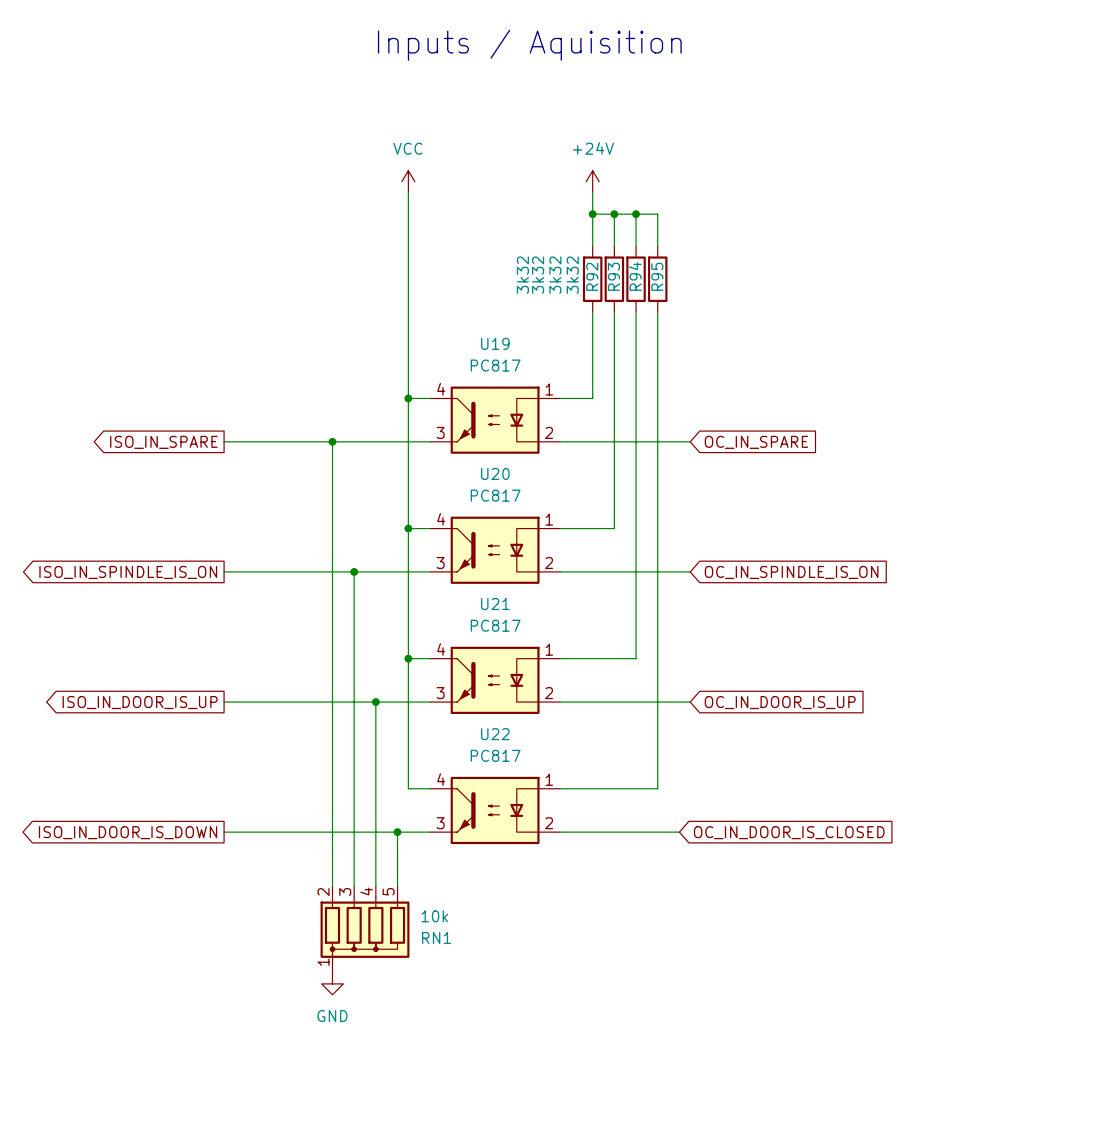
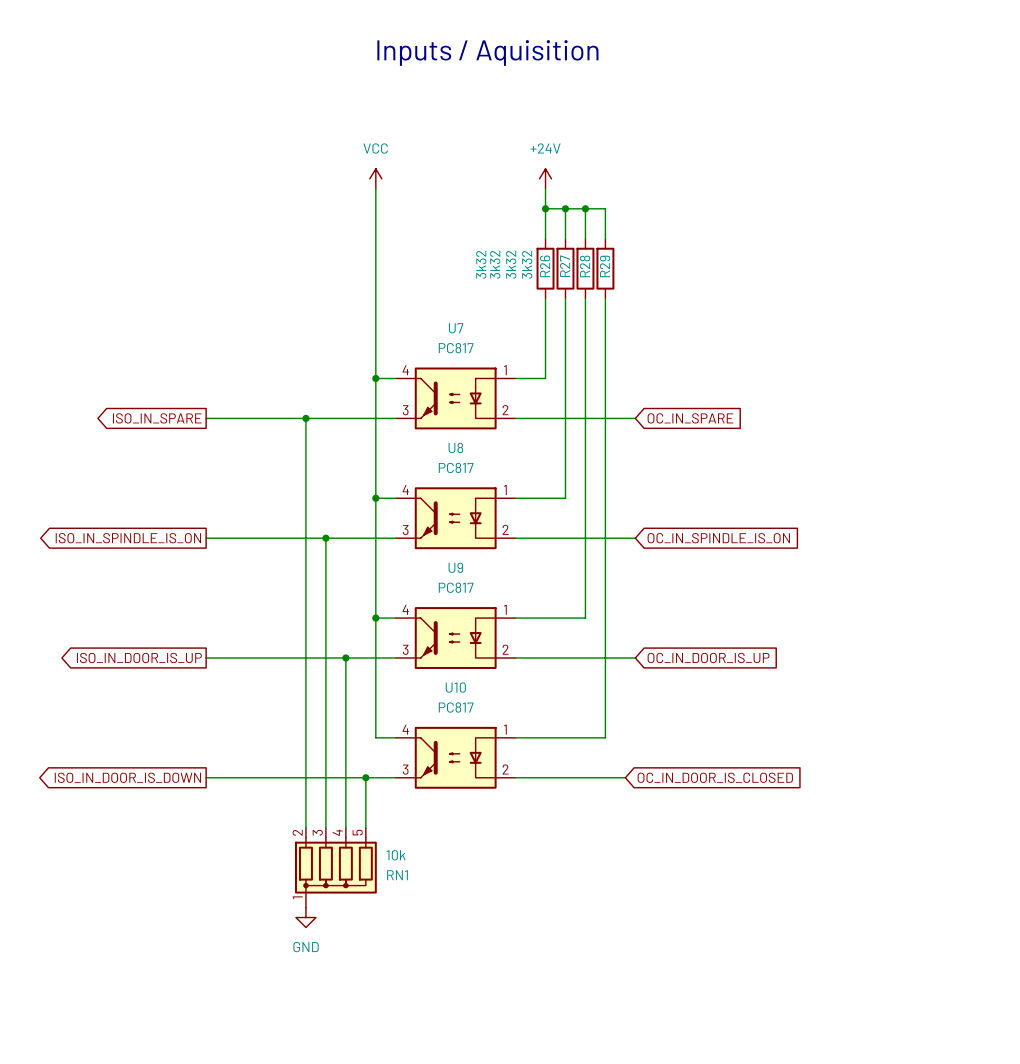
R92 name: R92 (592, 276) -> R26 (545, 266)
R93 name: R93 (613, 276) -> R27 (565, 266)
R94 name: R94 (635, 276) -> R28 (585, 266)
R95 name: R95 (657, 276) -> R29 (605, 266)
U19 name: U19 (495, 343) -> U7 (456, 328)
U20 name: U20 (495, 473) -> U8 (455, 447)
U21 name: U21 (495, 604) -> U9 (455, 567)
U22 name: U22 (495, 734) -> U10 (455, 687)

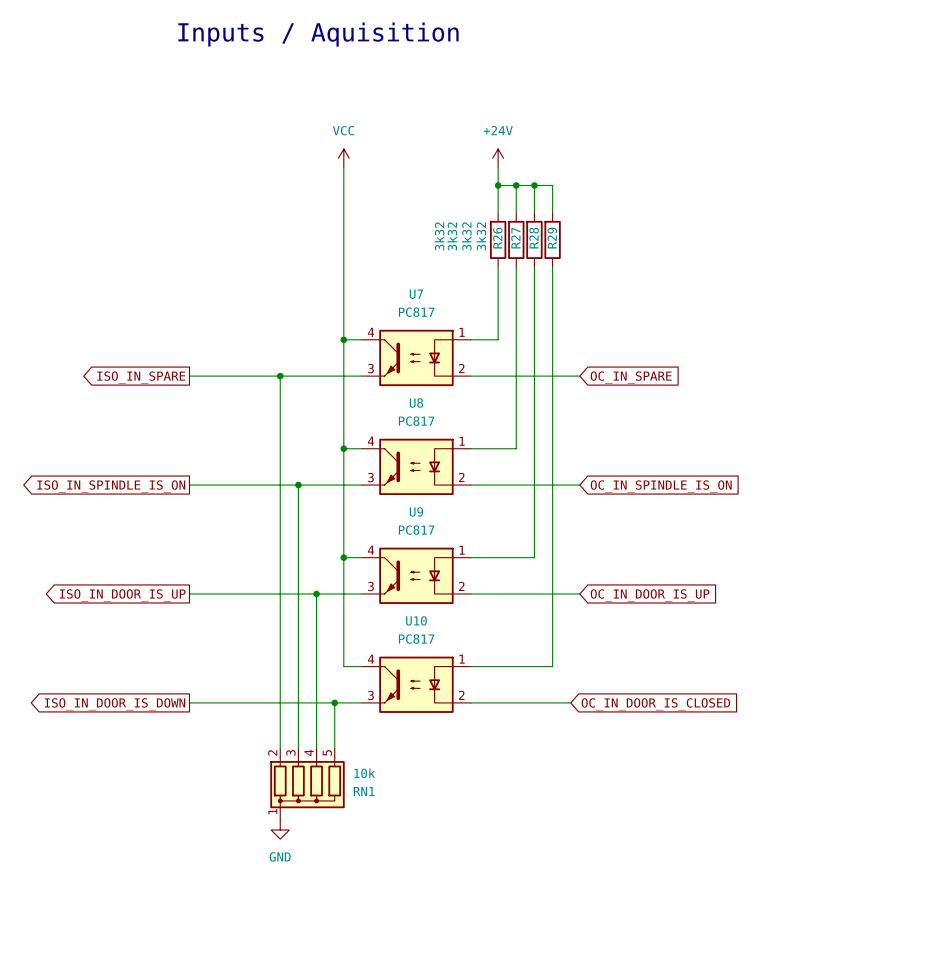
text position: Inputs / Aquisition (487, 52) -> Inputs / Aquisition (318, 34)

